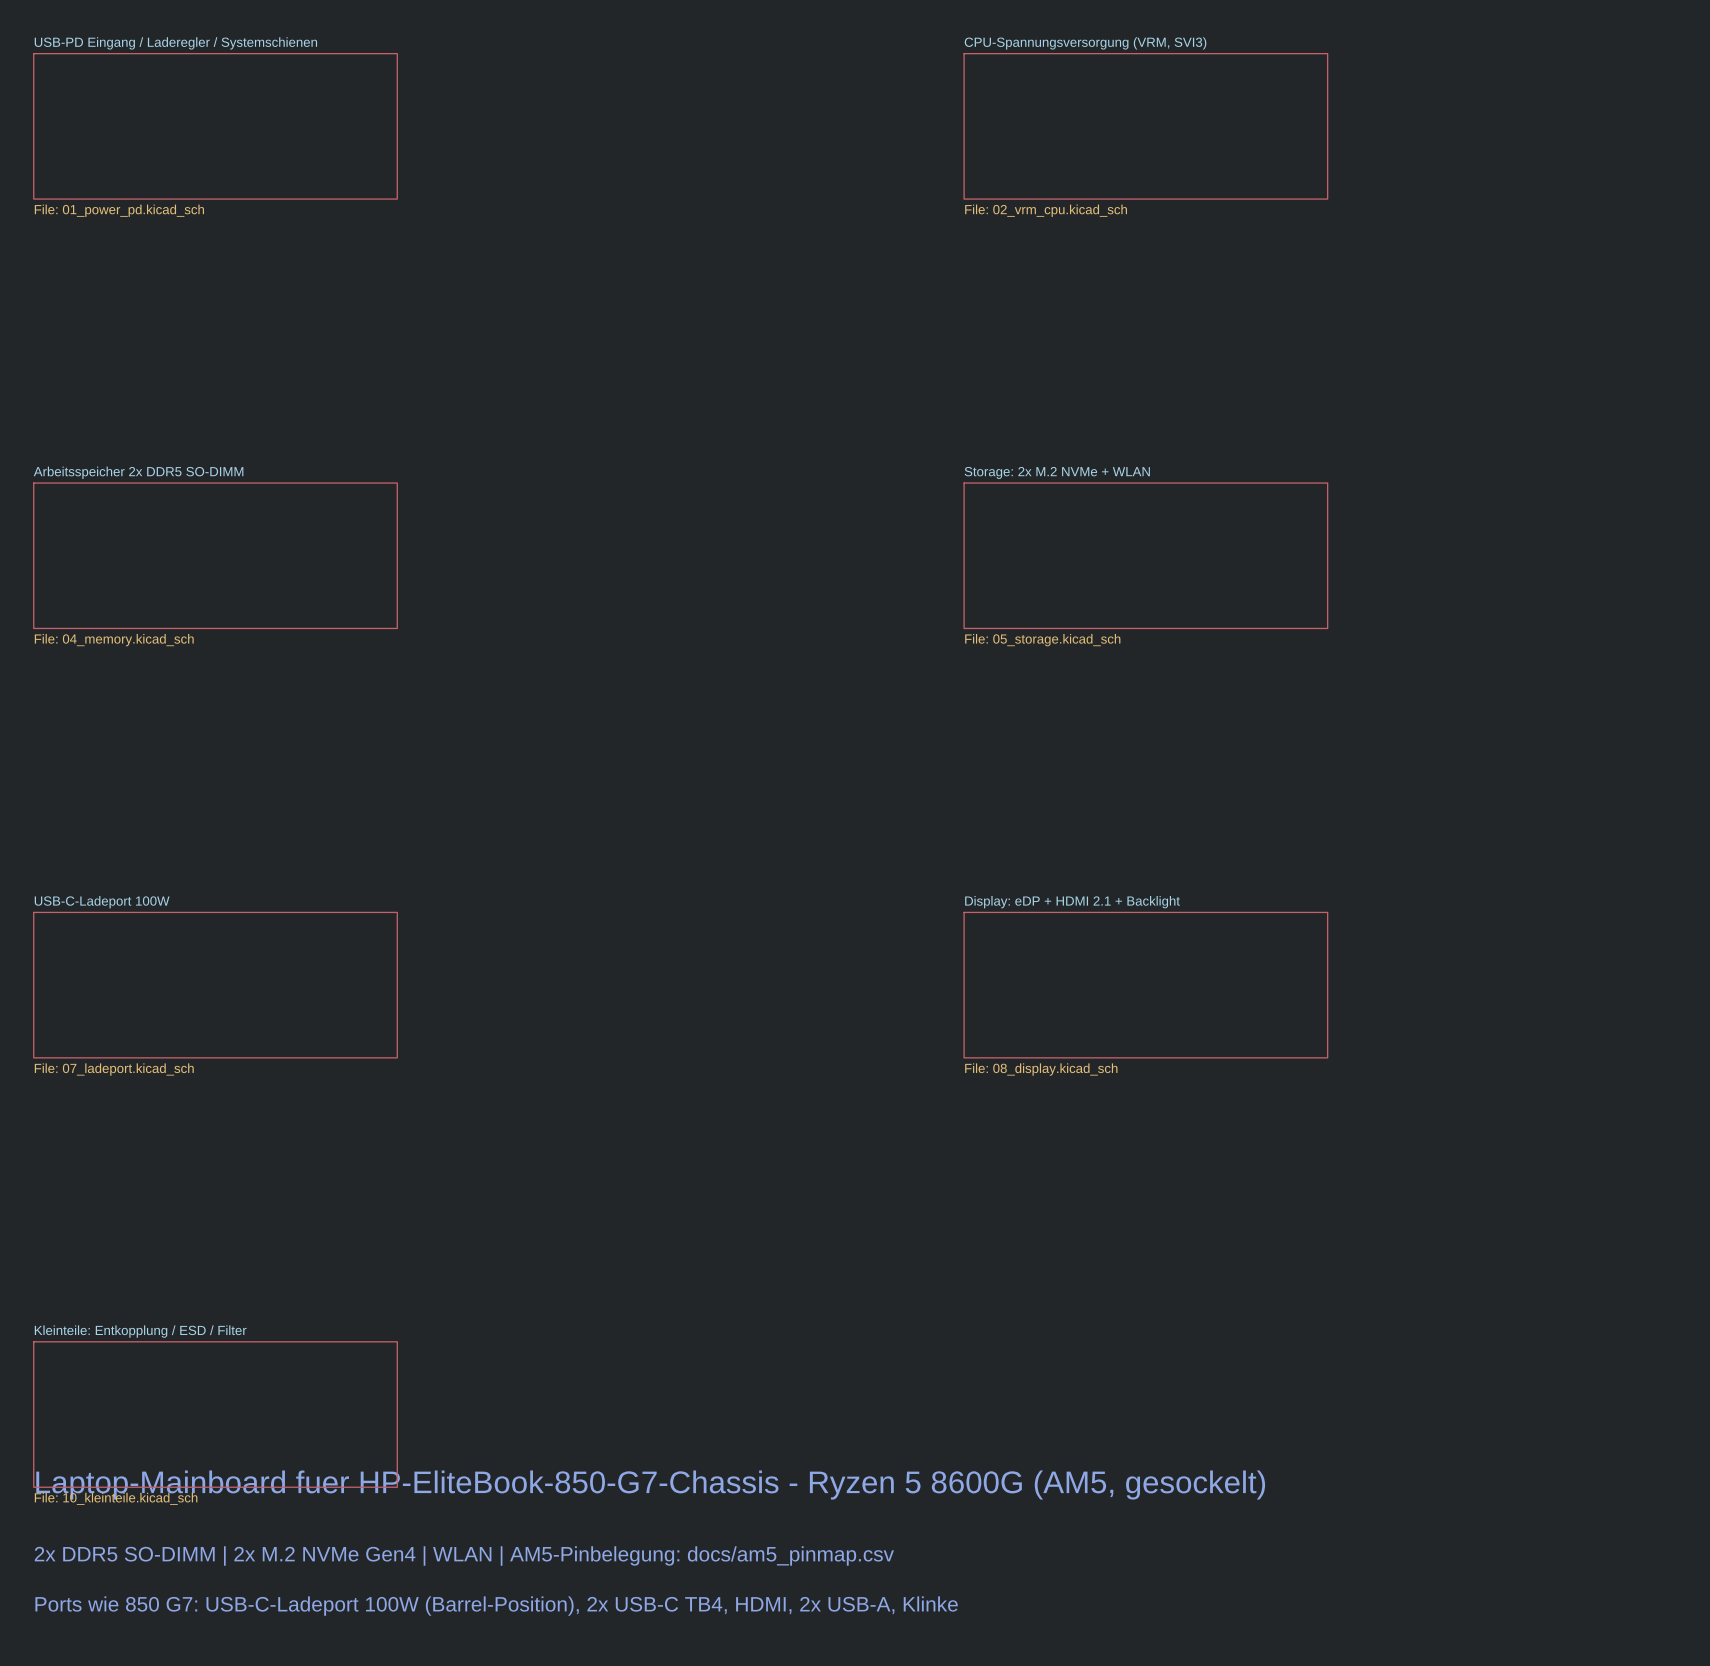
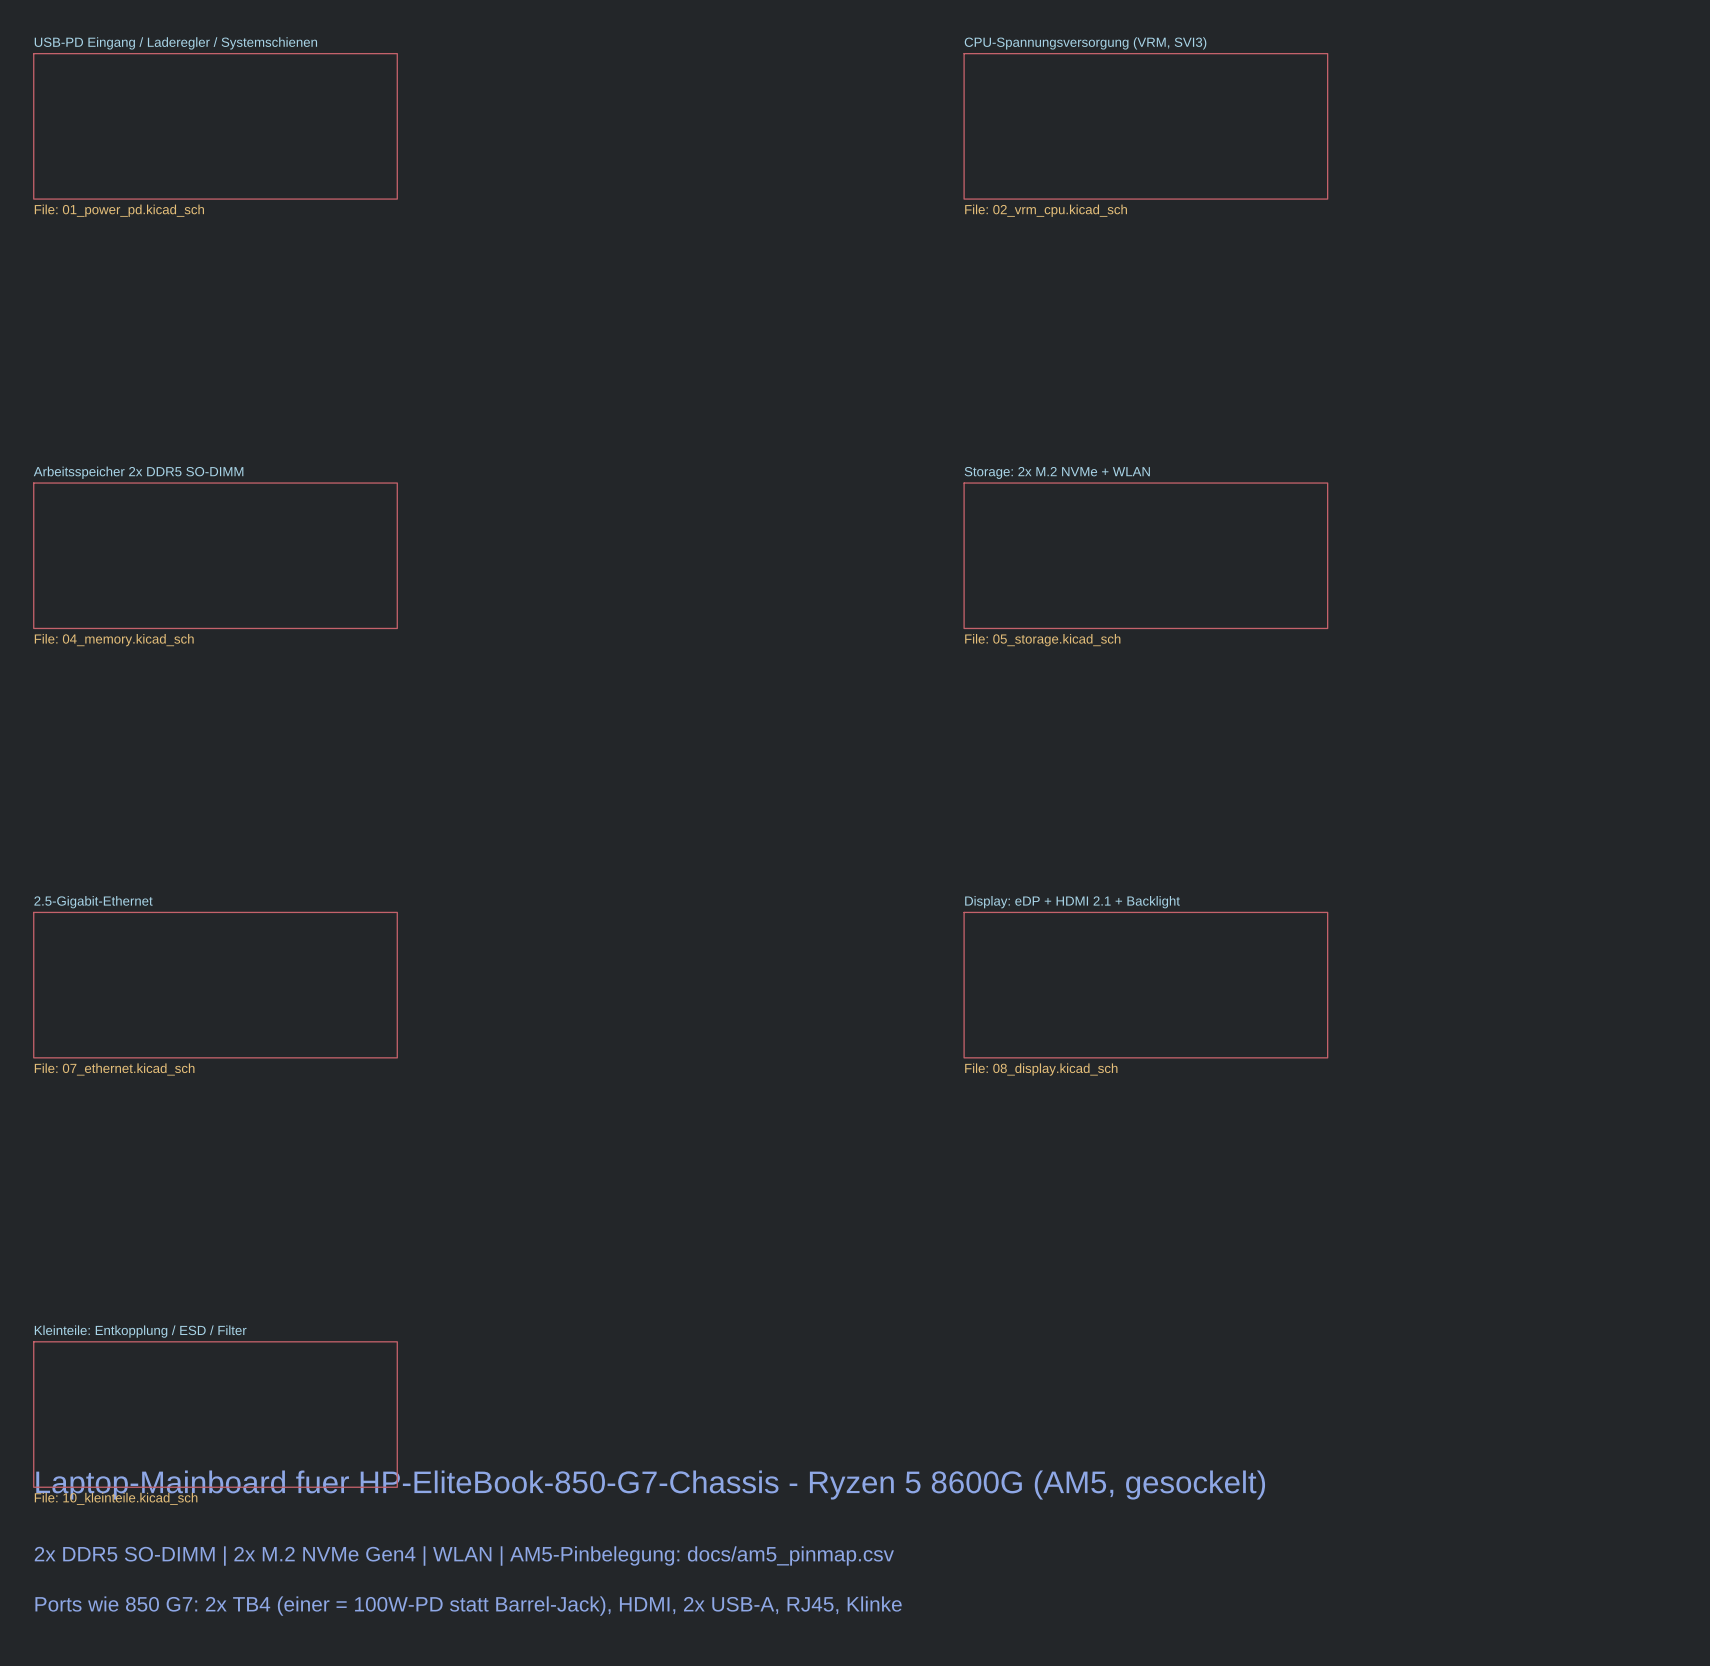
sheet USB-C-Ladeport 100W name: USB-C-Ladeport 100W (102, 902) -> 2.5-Gigabit-Ethernet (93, 902)
sheet USB-C-Ladeport 100W value: File: 07_ladeport.kicad_sch (114, 1069) -> File: 07_ethernet.kicad_sch (114, 1069)
text: Ports wie 850 G7: USB-C-Ladeport 100W (Barrel-Position), 2x USB-C TB4, HDMI, 2x USB-A, Klinke (496, 1606) -> Ports wie 850 G7: 2x TB4 (einer = 100W-PD statt Barrel-Jack), HDMI, 2x USB-A, RJ45, Klinke (468, 1606)

